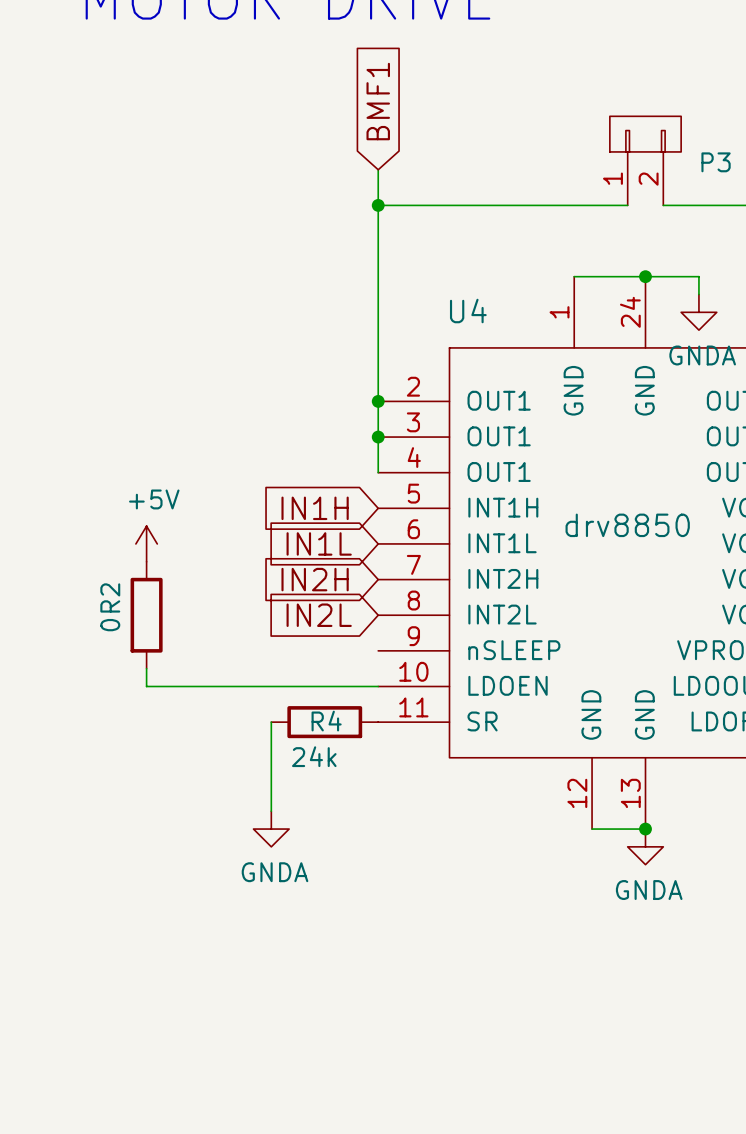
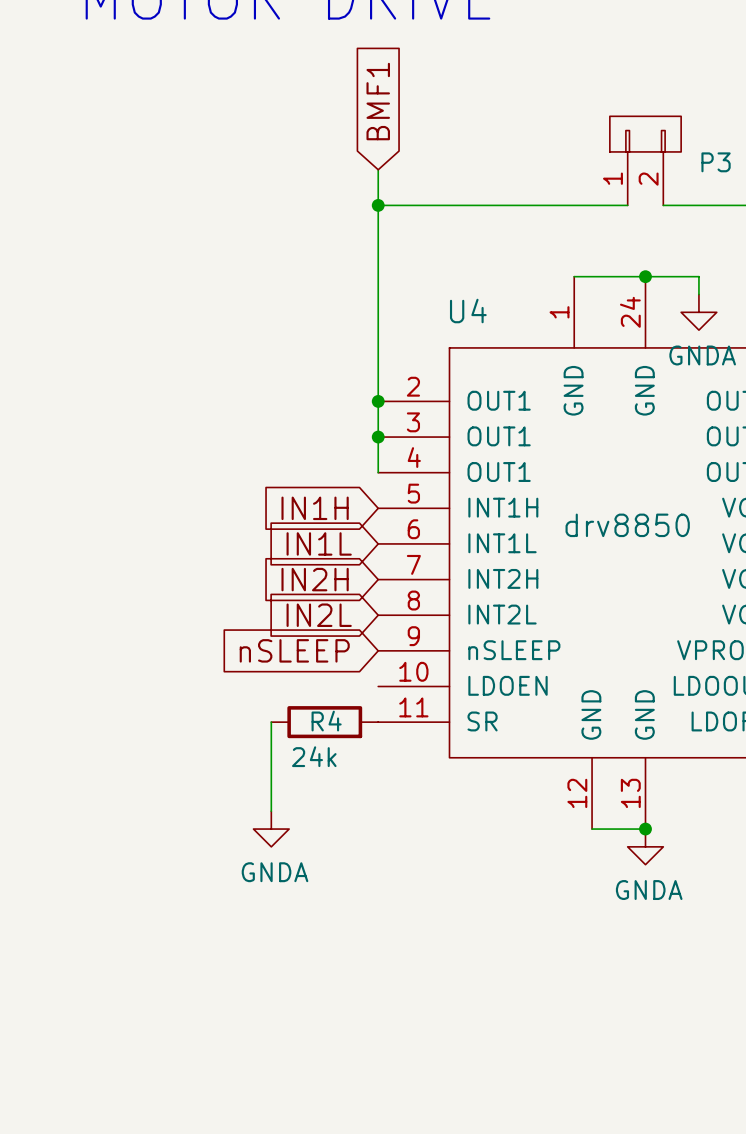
power symbol: +5V (146, 543) -> none
R2: 0 (146, 615) -> none
global label: none -> nSLEEP (294, 650)
wire: (146, 668) (146, 686) (378, 686) -> none

